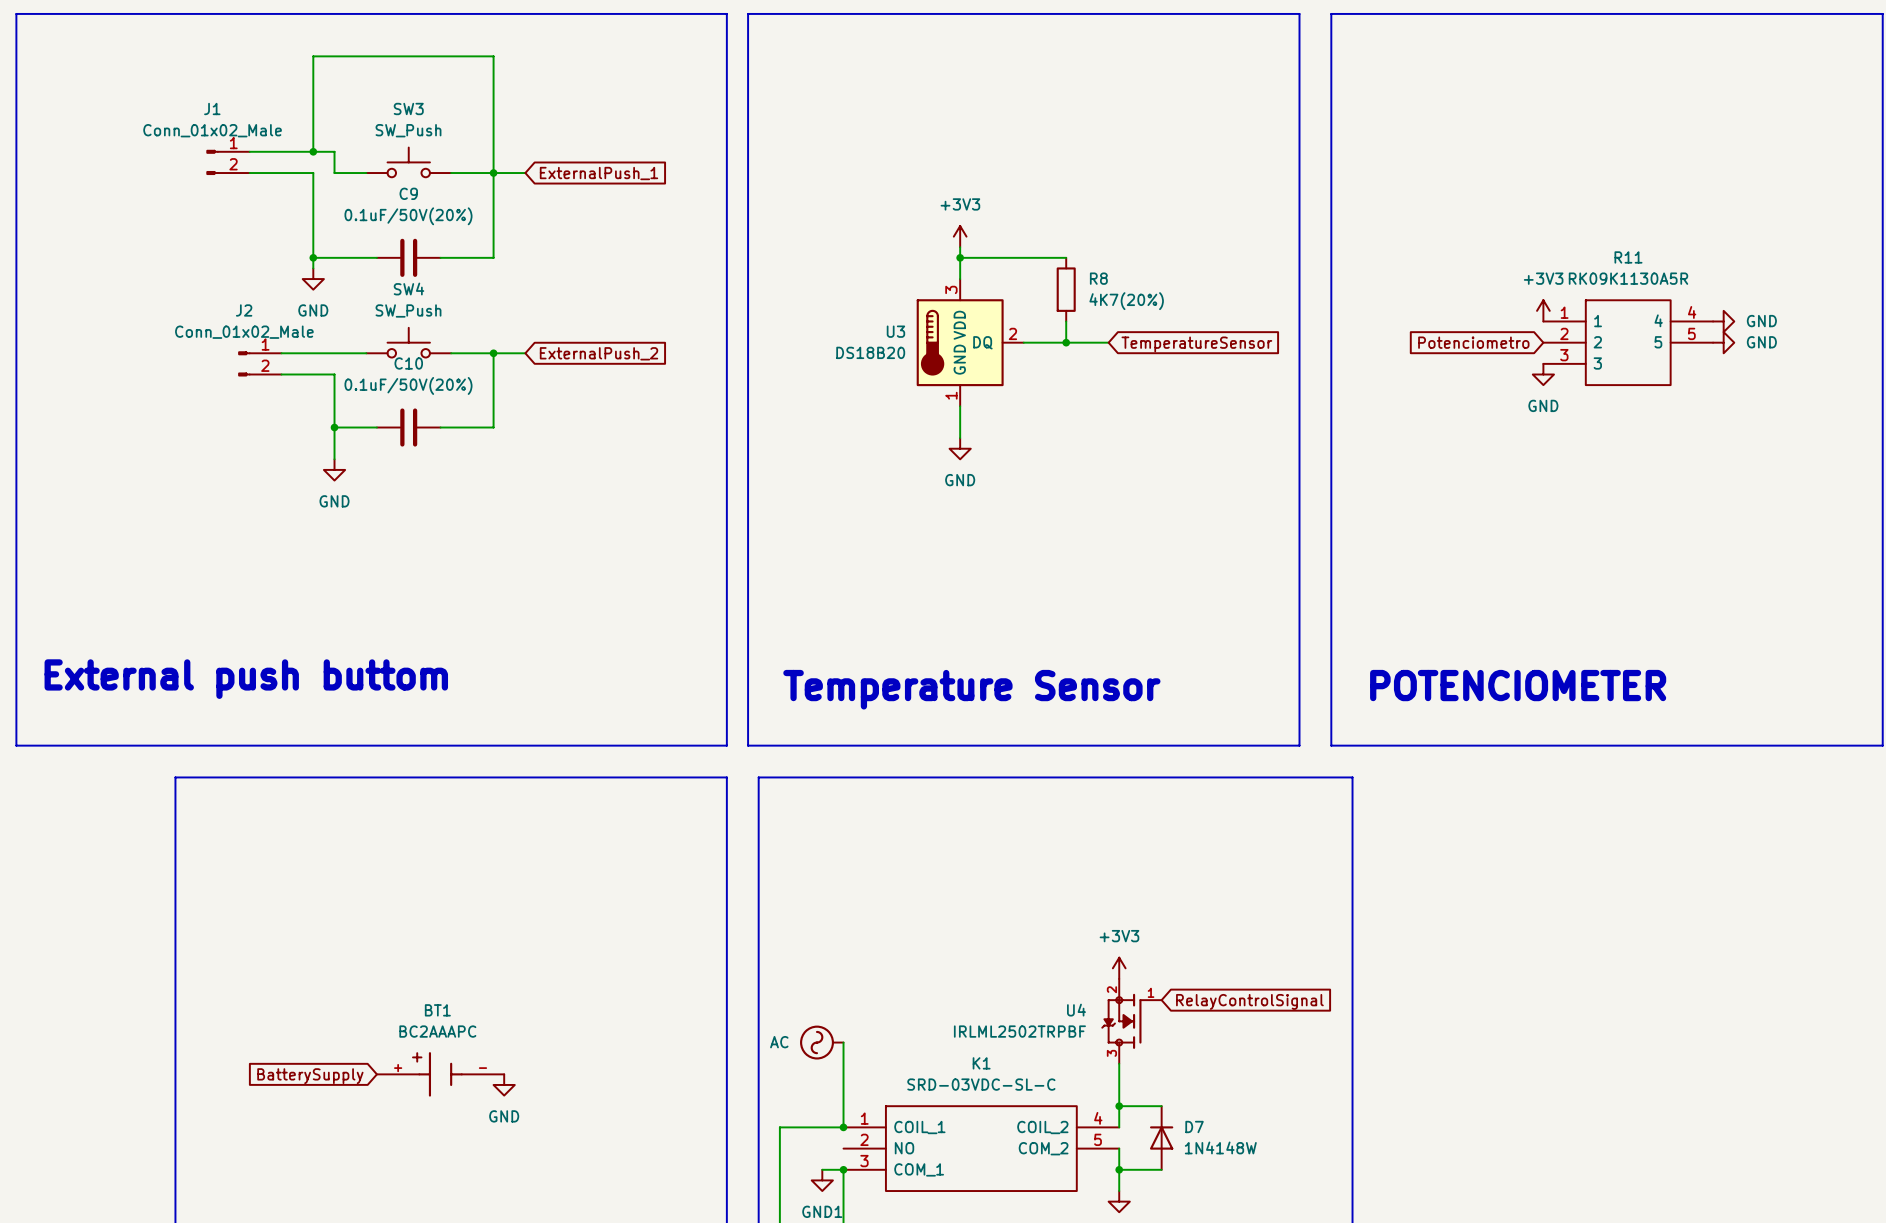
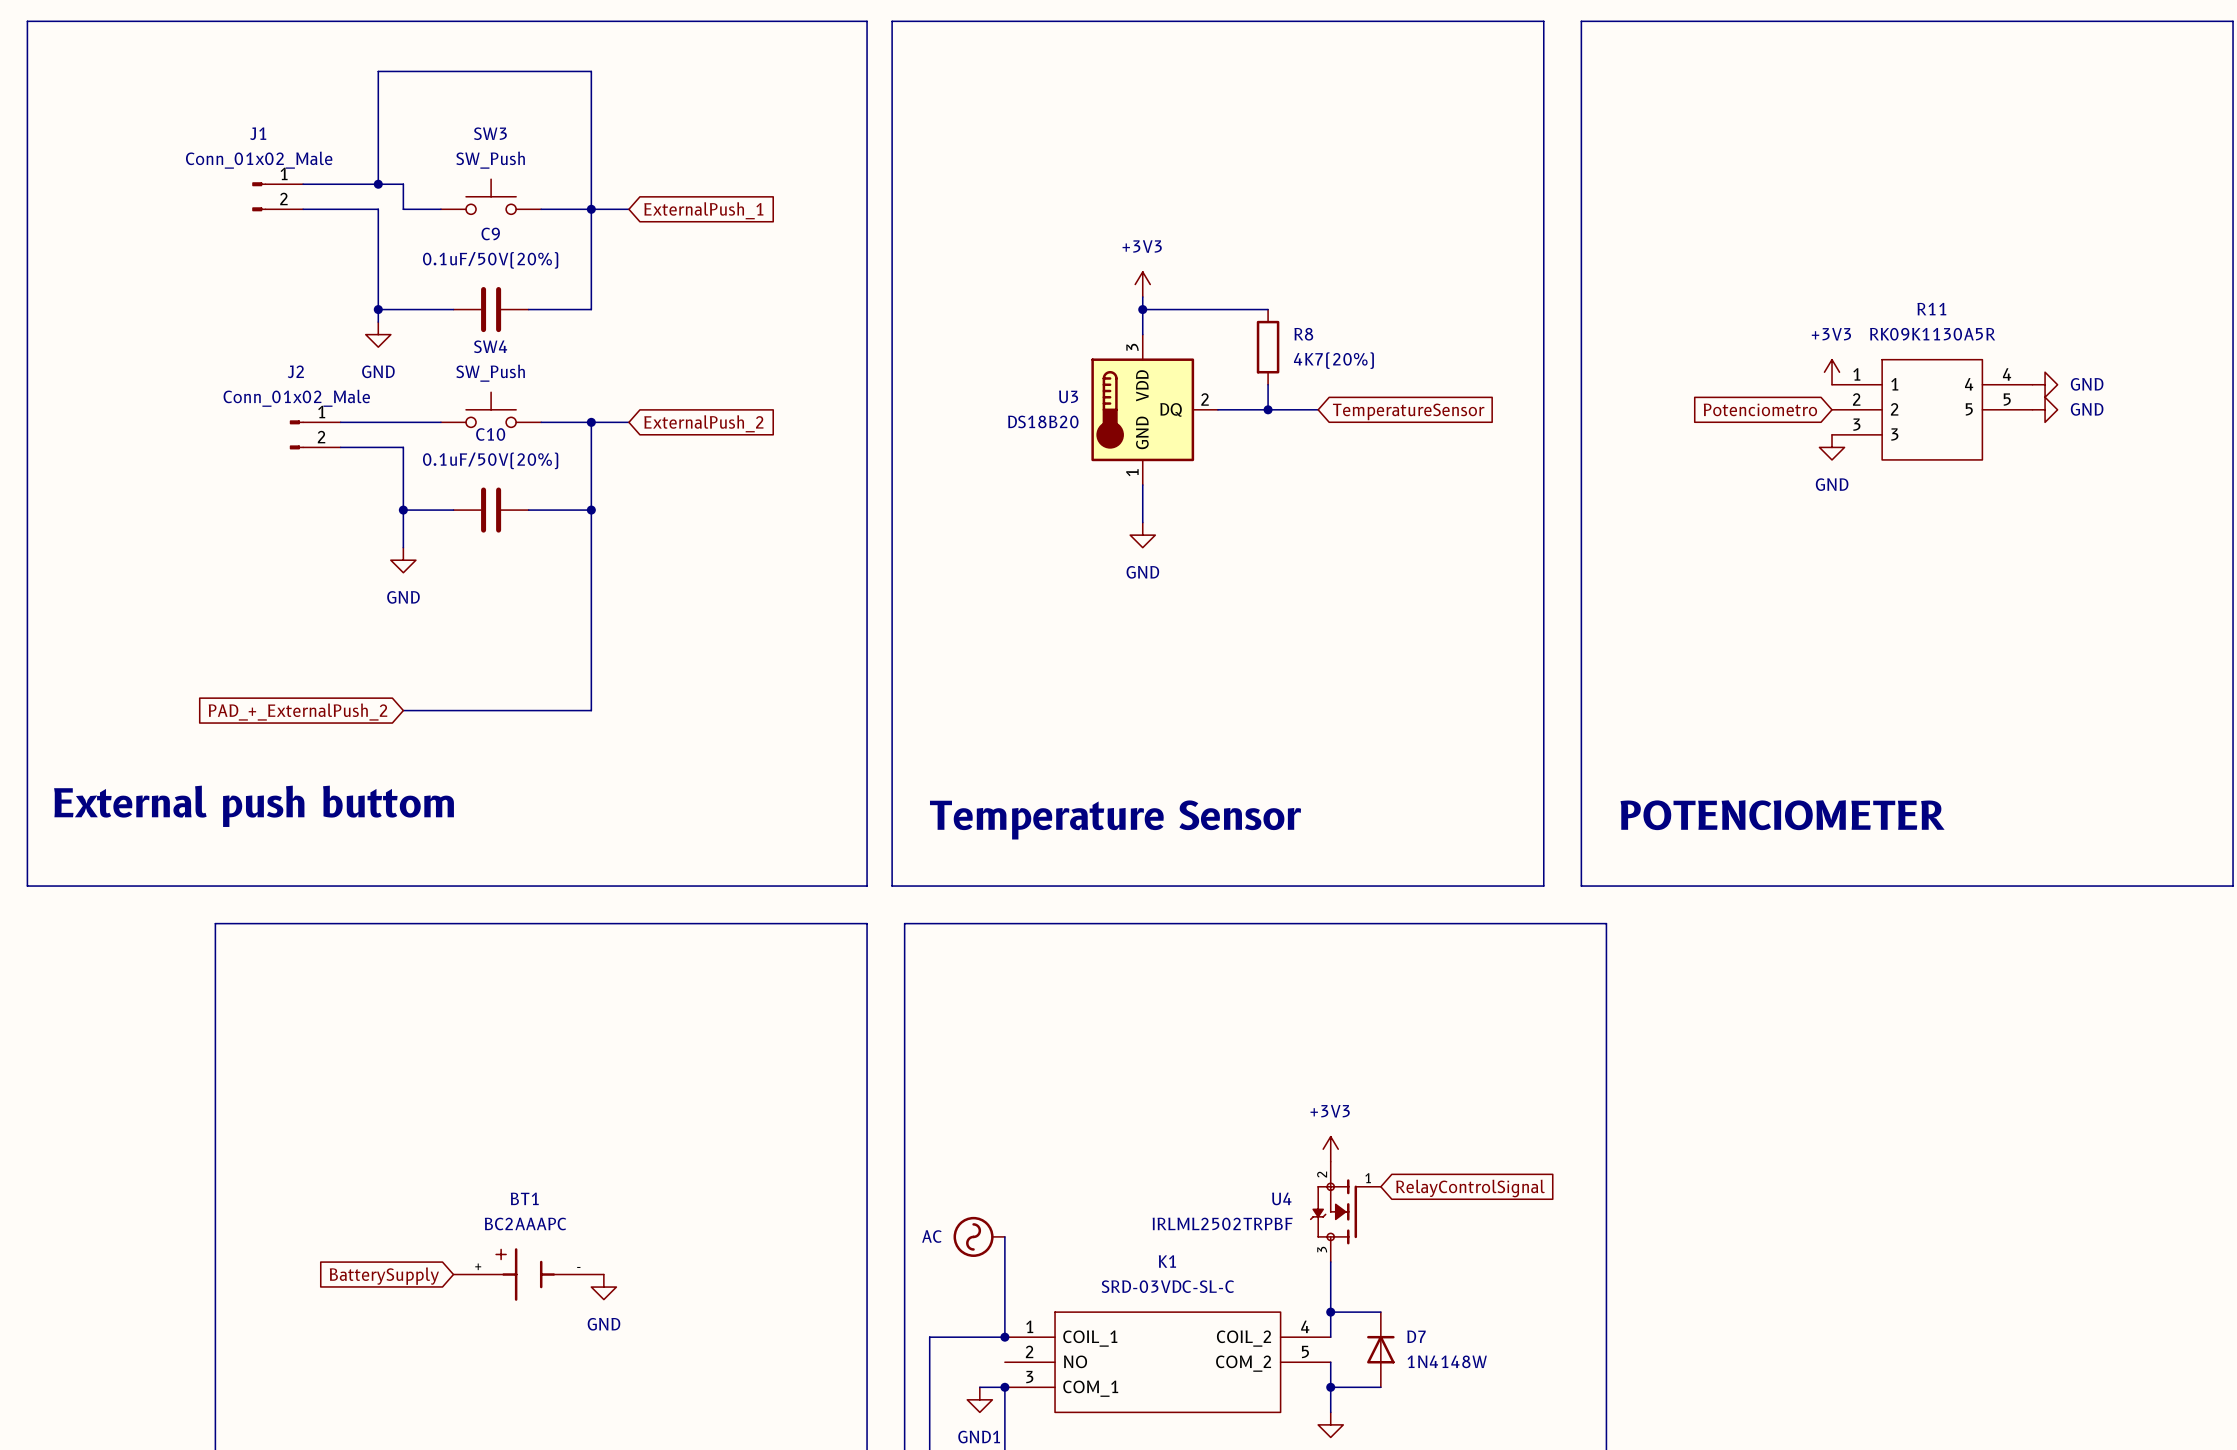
wire: none -> (591, 510) (591, 710) (403, 710)
junction: none -> (591, 510)
global label: none -> PAD_+_ExternalPush_2 (298, 712)

